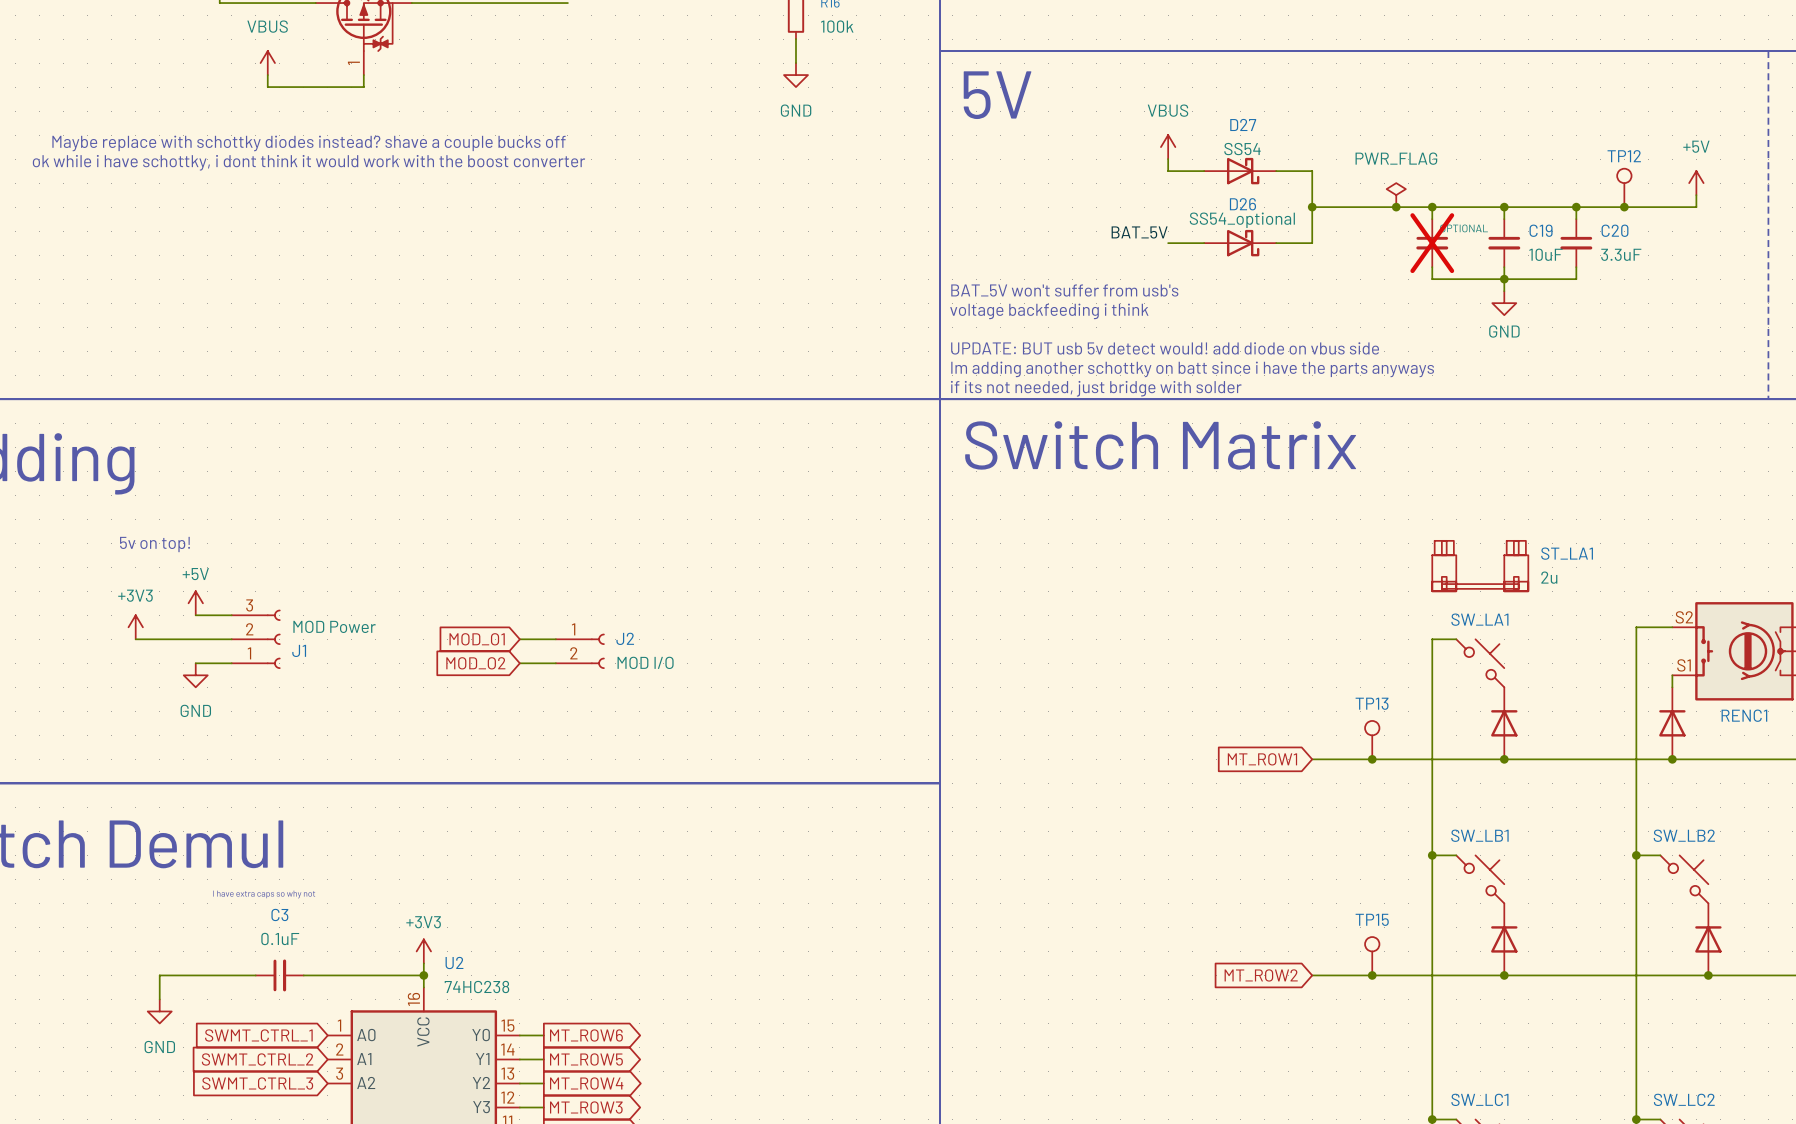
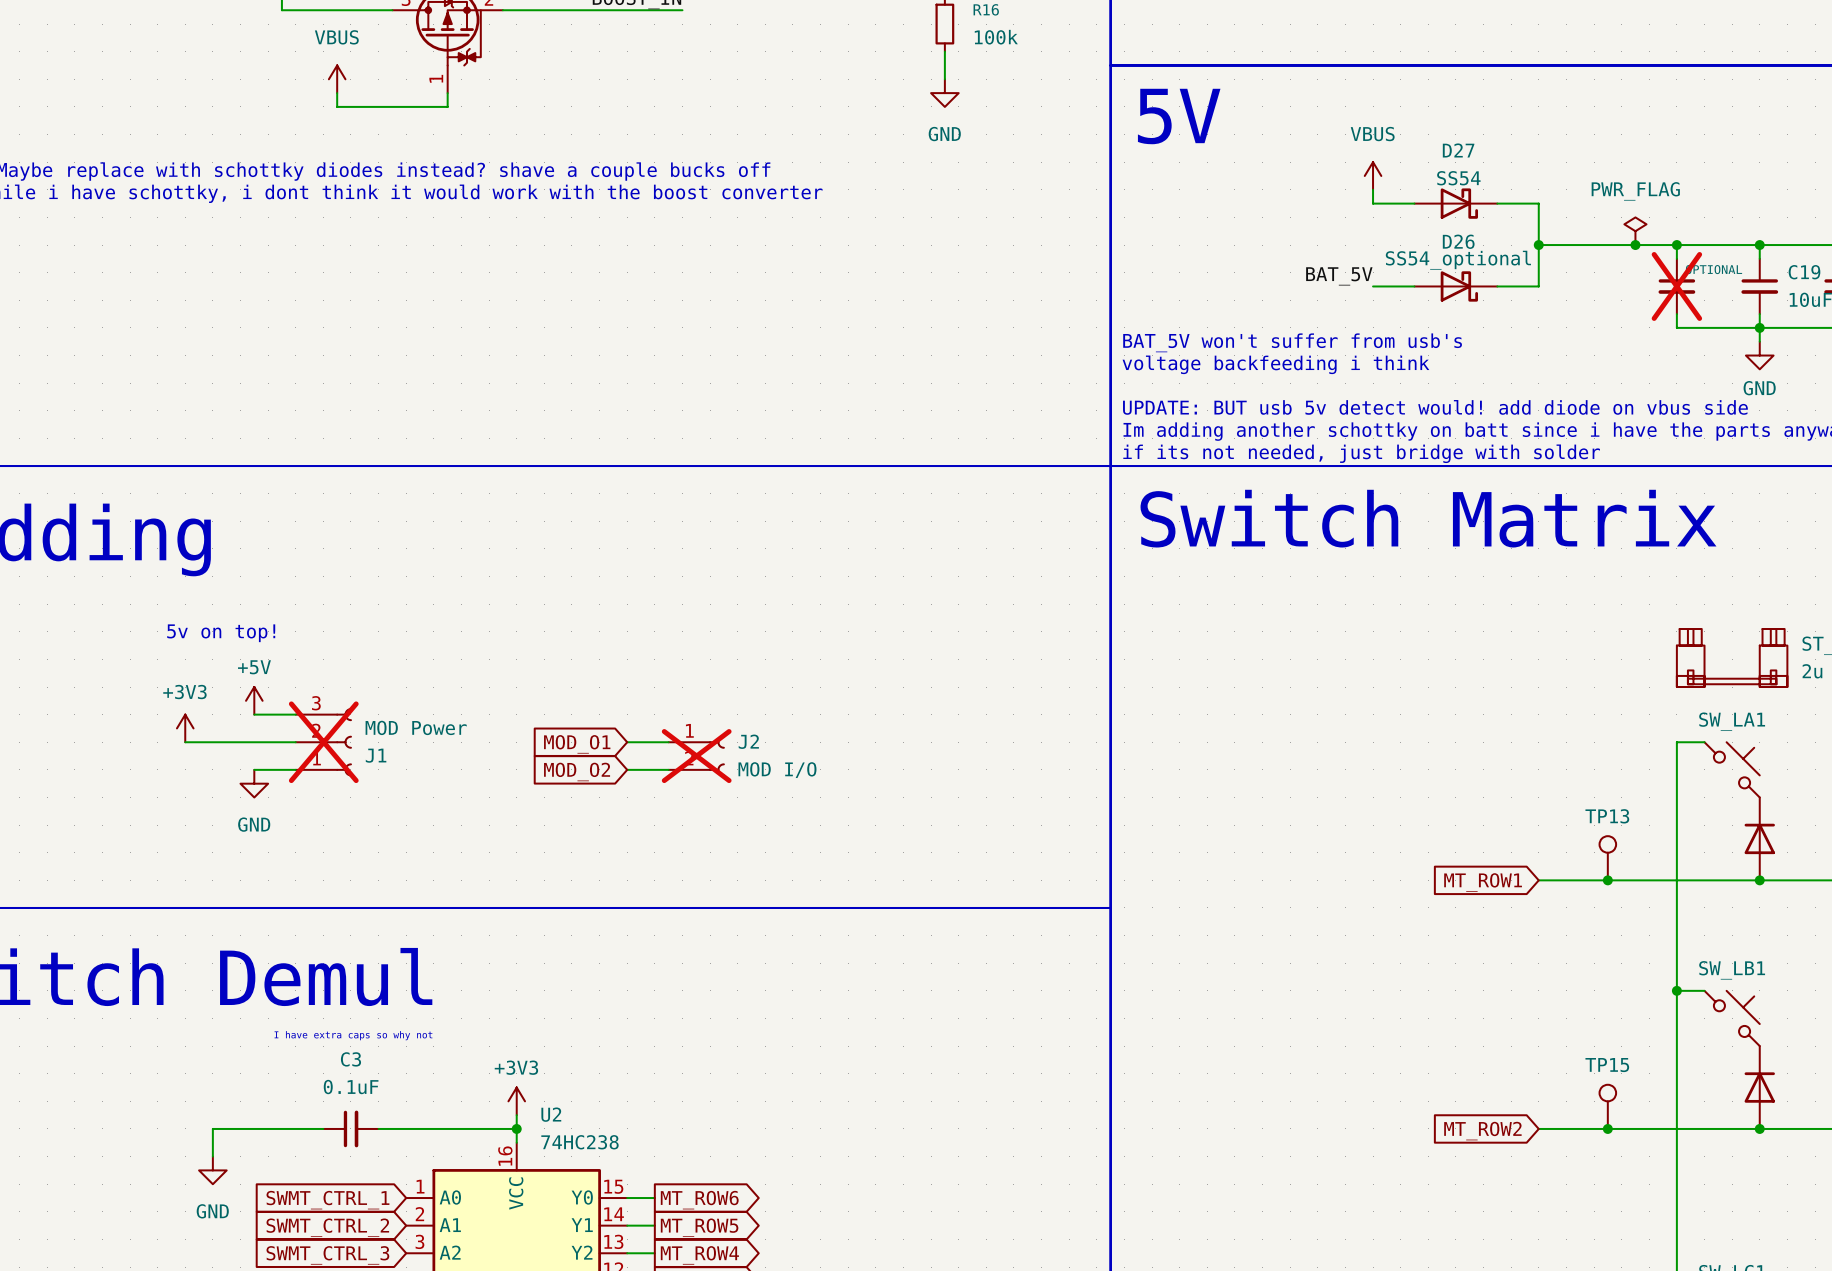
J1 do-not-place cross: none -> (323, 742)
J2 do-not-place cross: none -> (696, 756)

